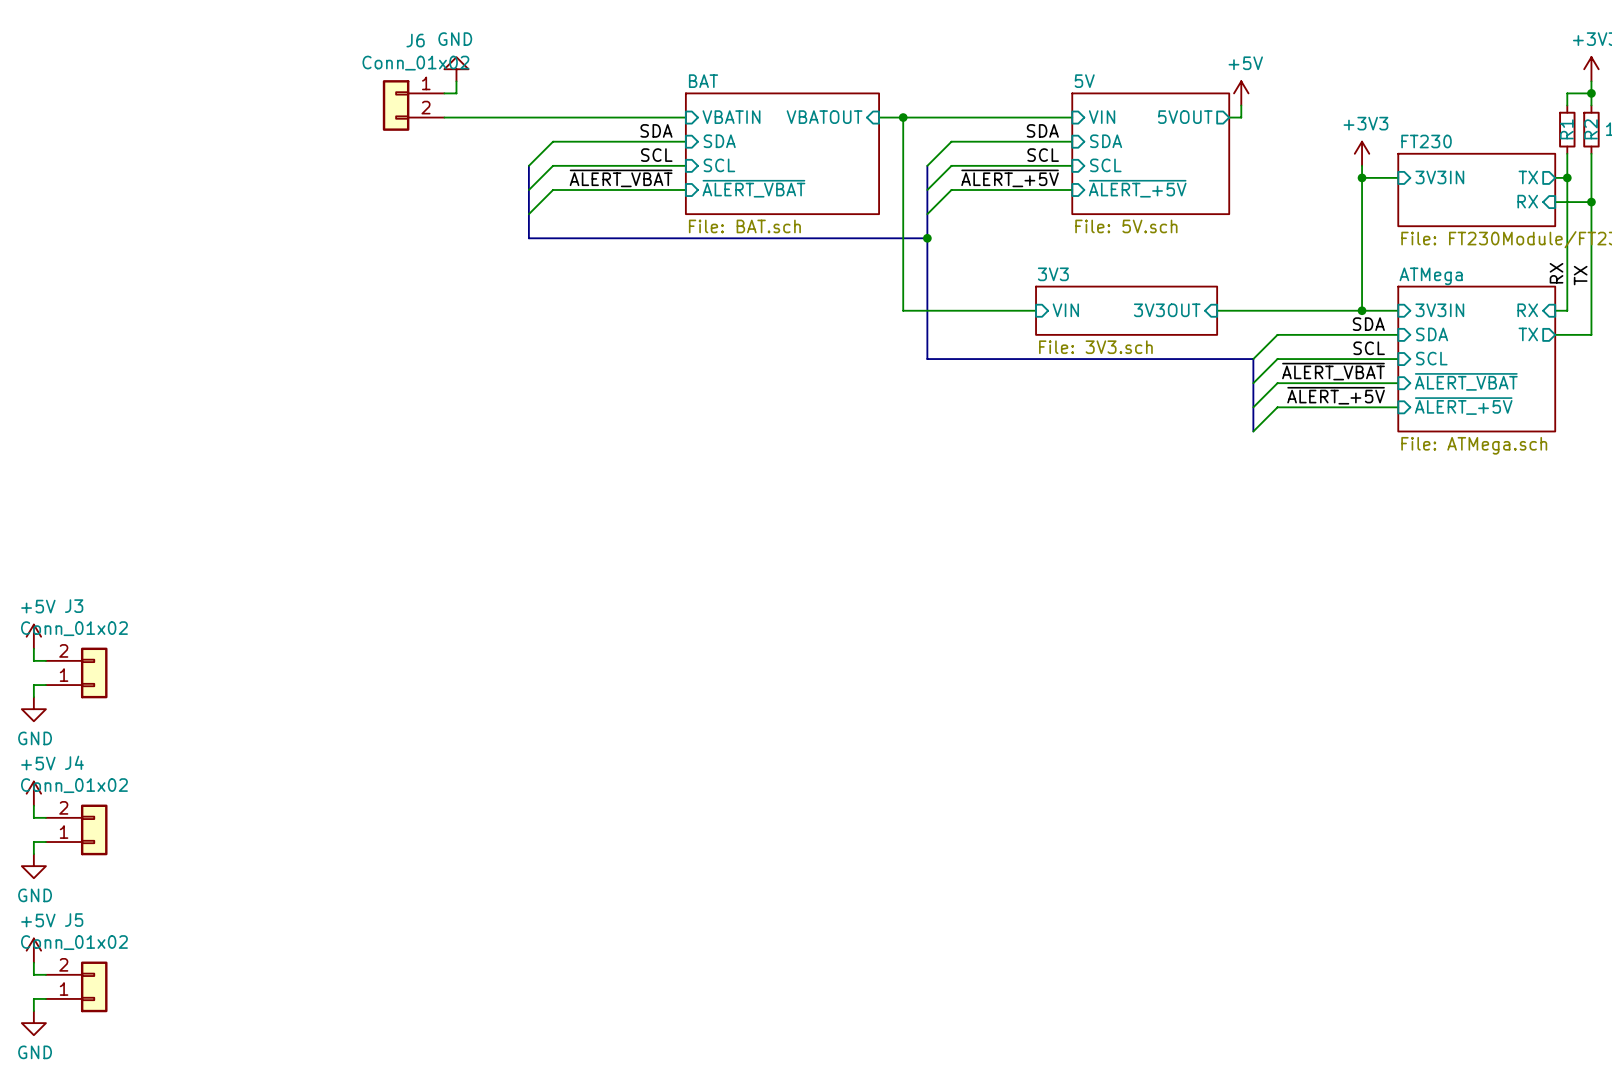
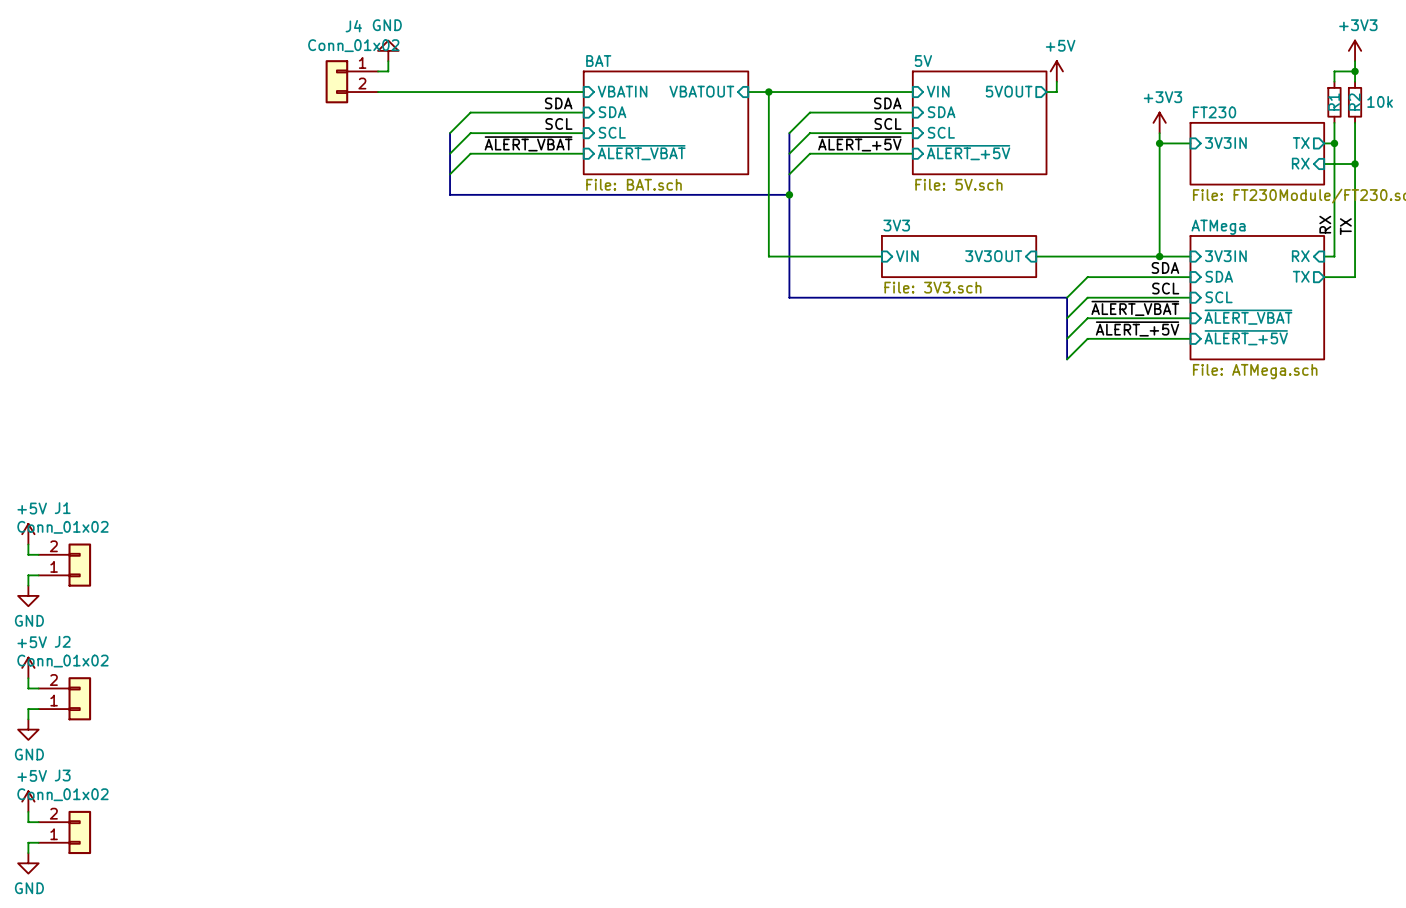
J6 name: J6 (415, 40) -> J4 (353, 26)
J3 name: J3 (74, 606) -> J1 (62, 508)
J4 name: J4 (74, 762) -> J2 (62, 641)
J5 name: J5 (74, 920) -> J3 (62, 775)

